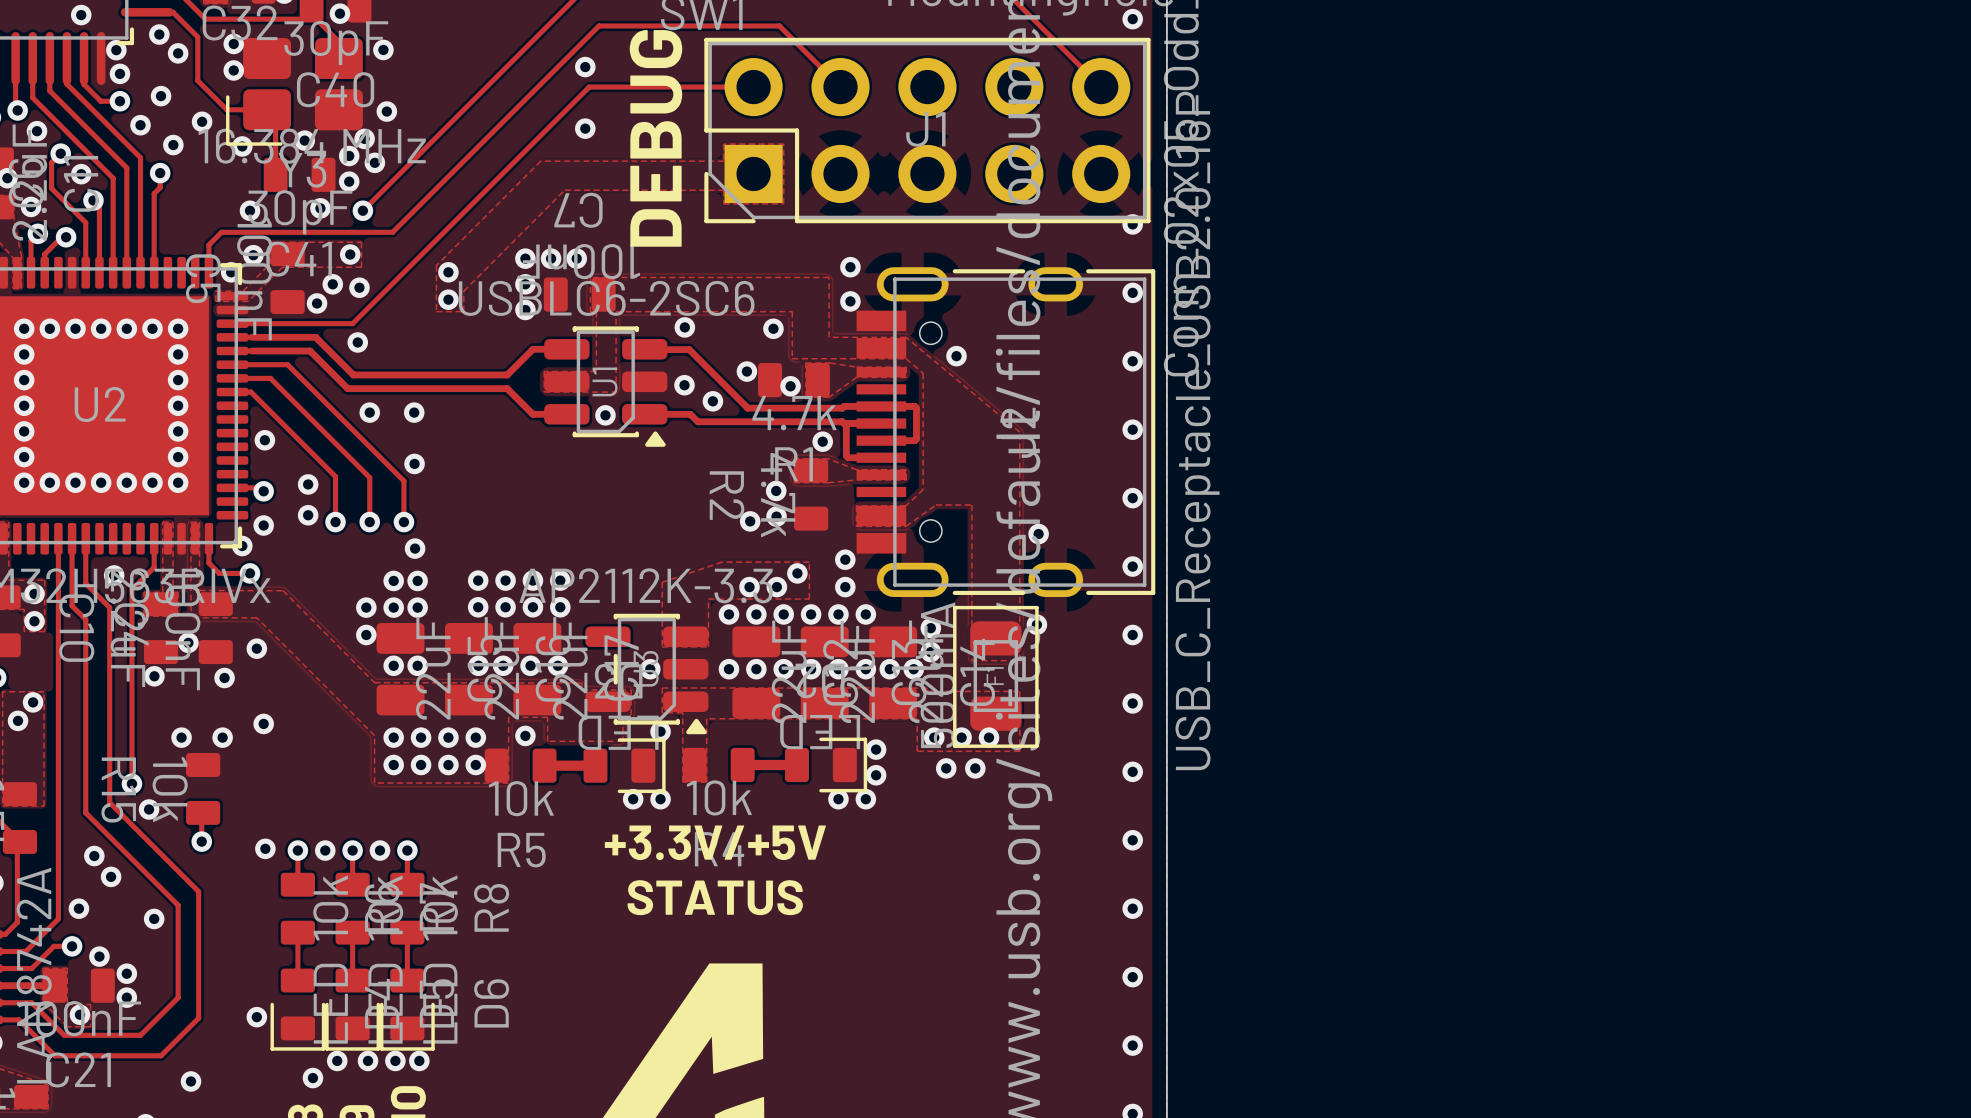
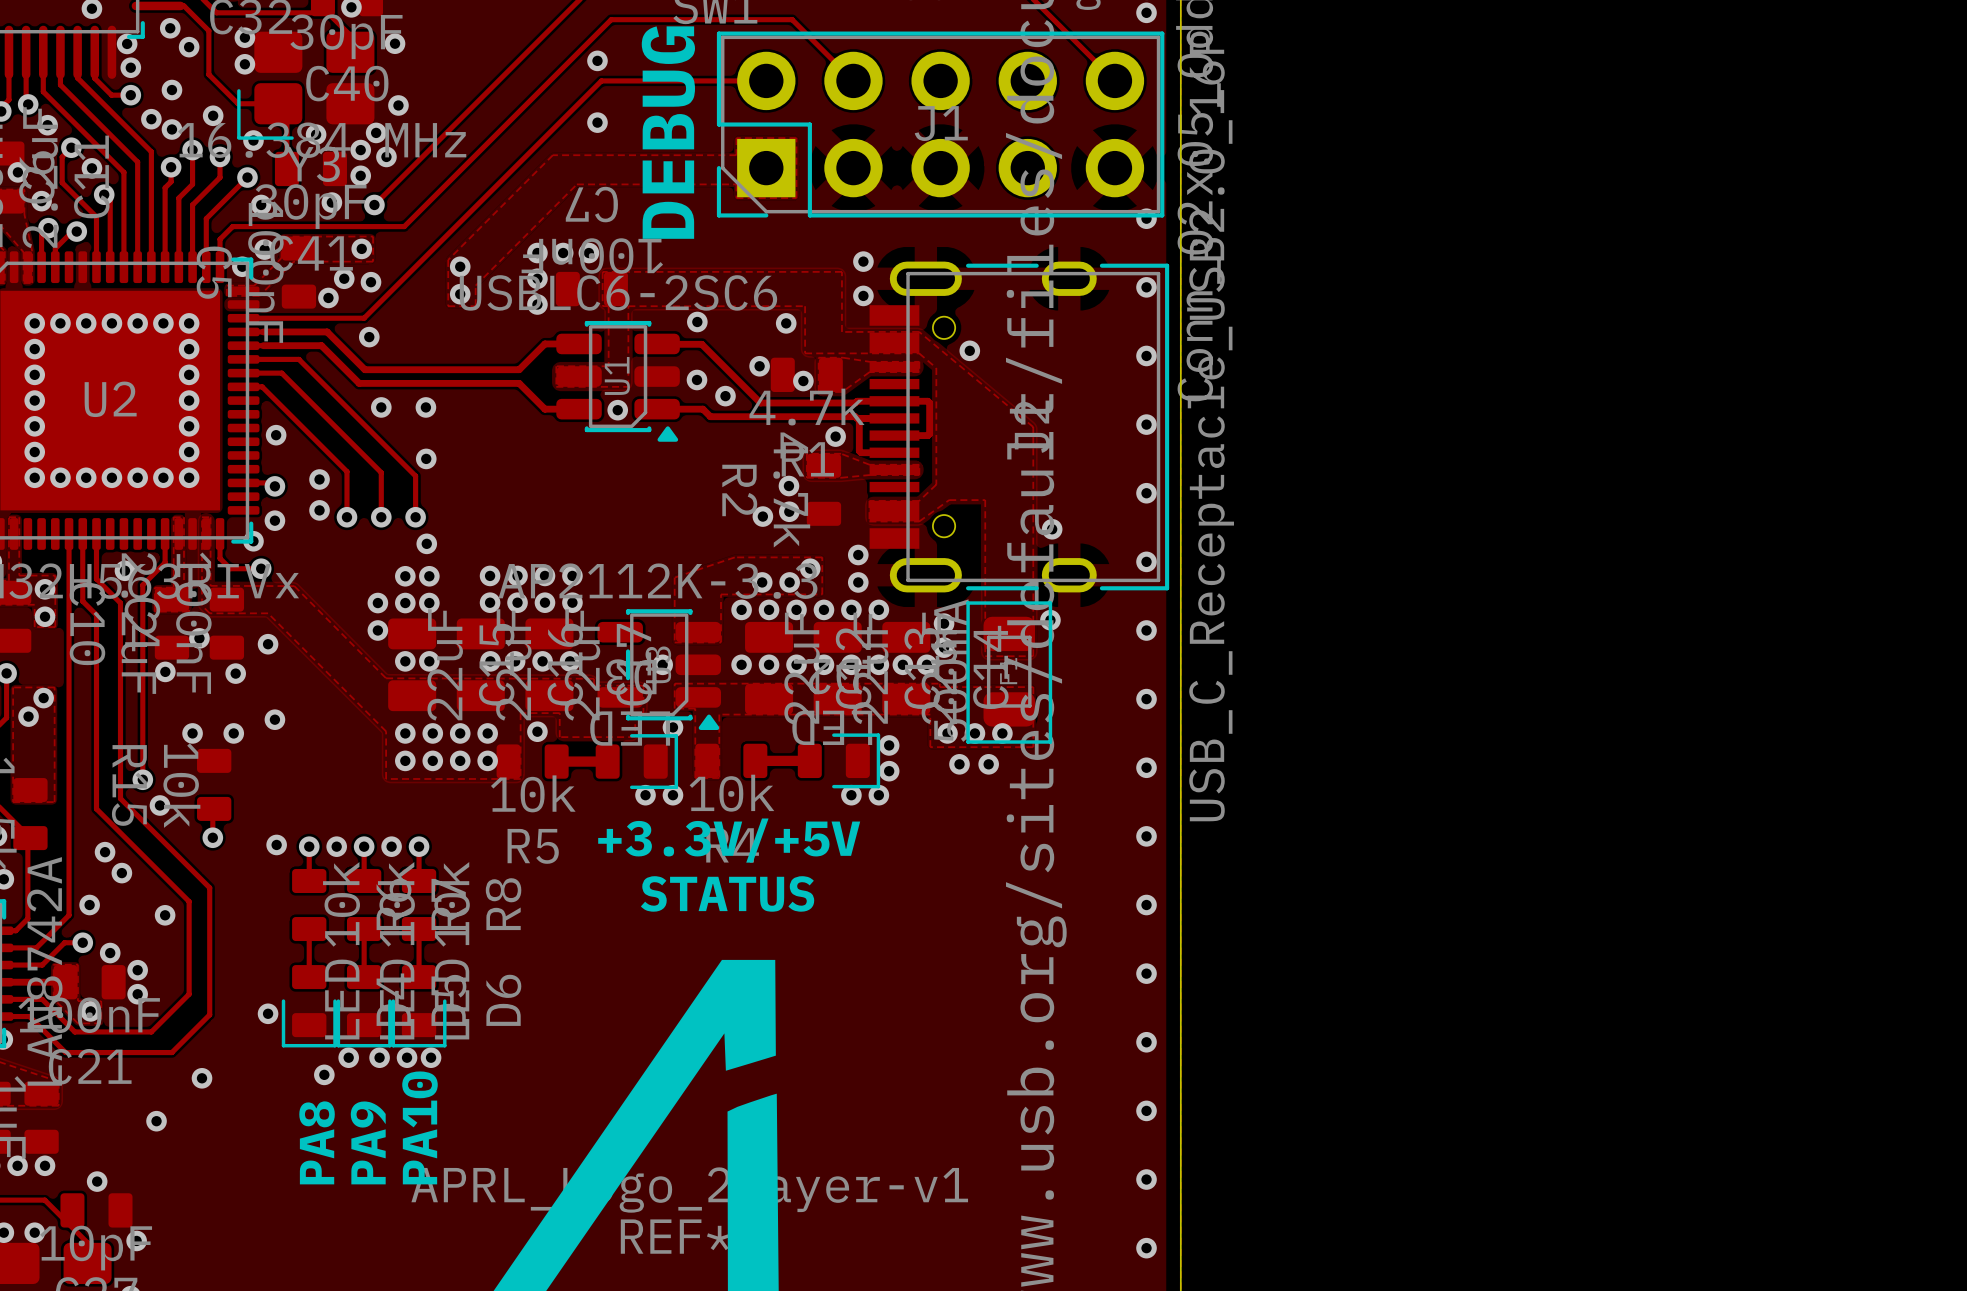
via: none -> (171, 129)
via: (173, 145) -> none
track: none -> (192, 150) (192, 184) (178, 198) (178, 267)
via: none -> (192, 150)
track: none -> (220, 156) (220, 177) (192, 204) (192, 267)
via: none -> (220, 156)
track: none -> (247, 177) (206, 218) (206, 267)
via: none -> (247, 177)

